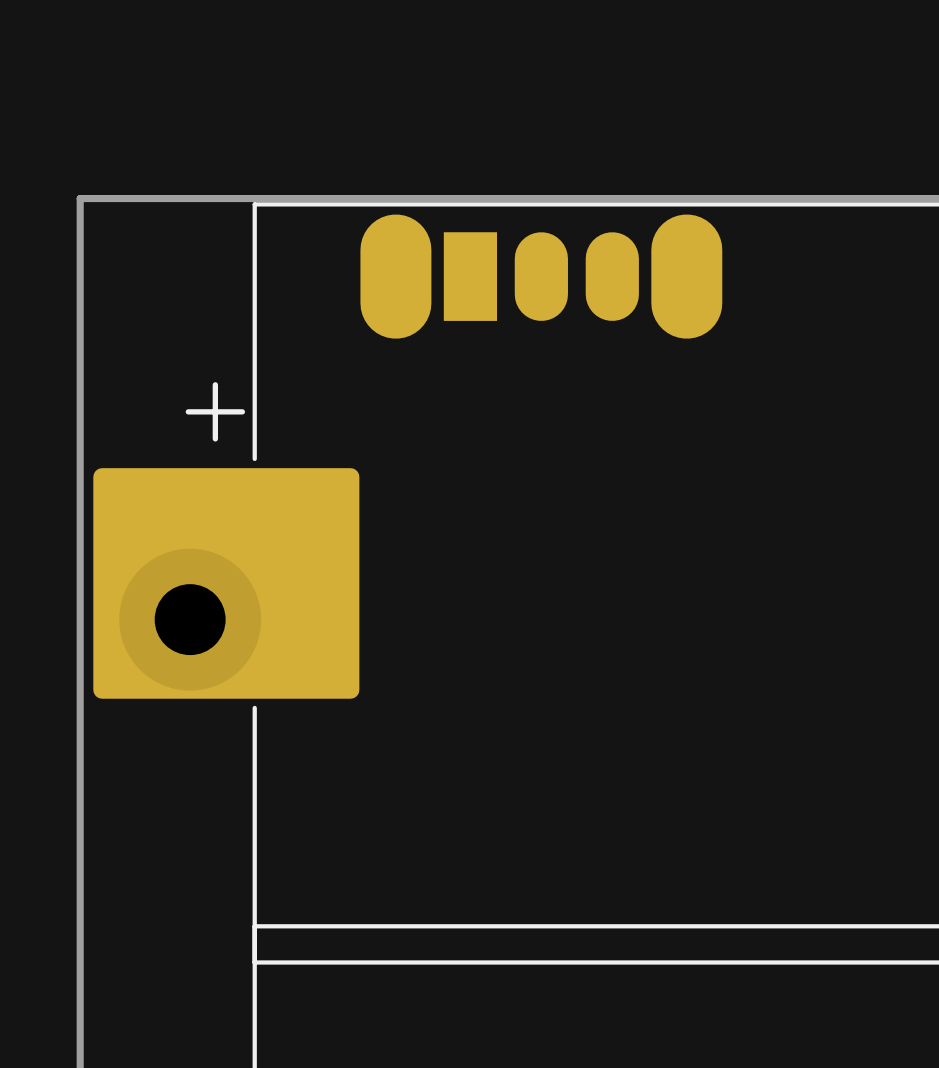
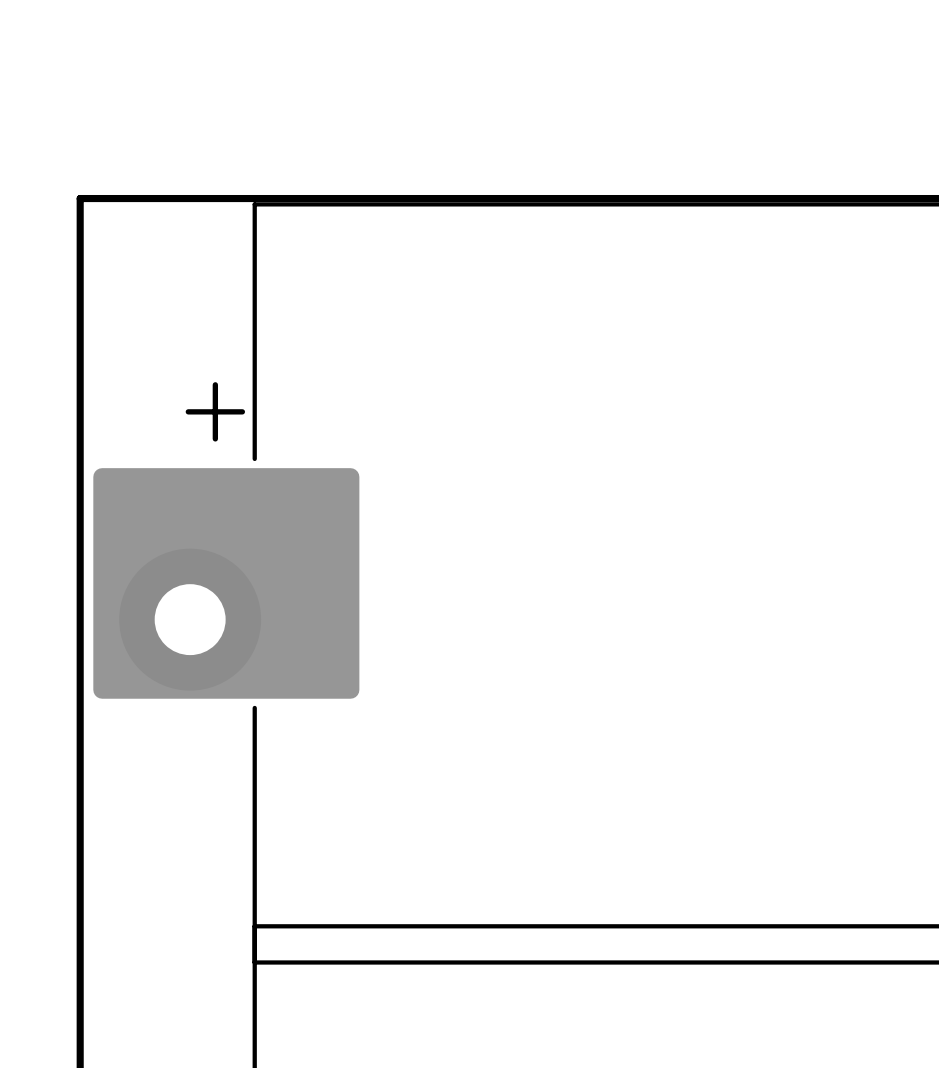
part: (541, 276) -> none

